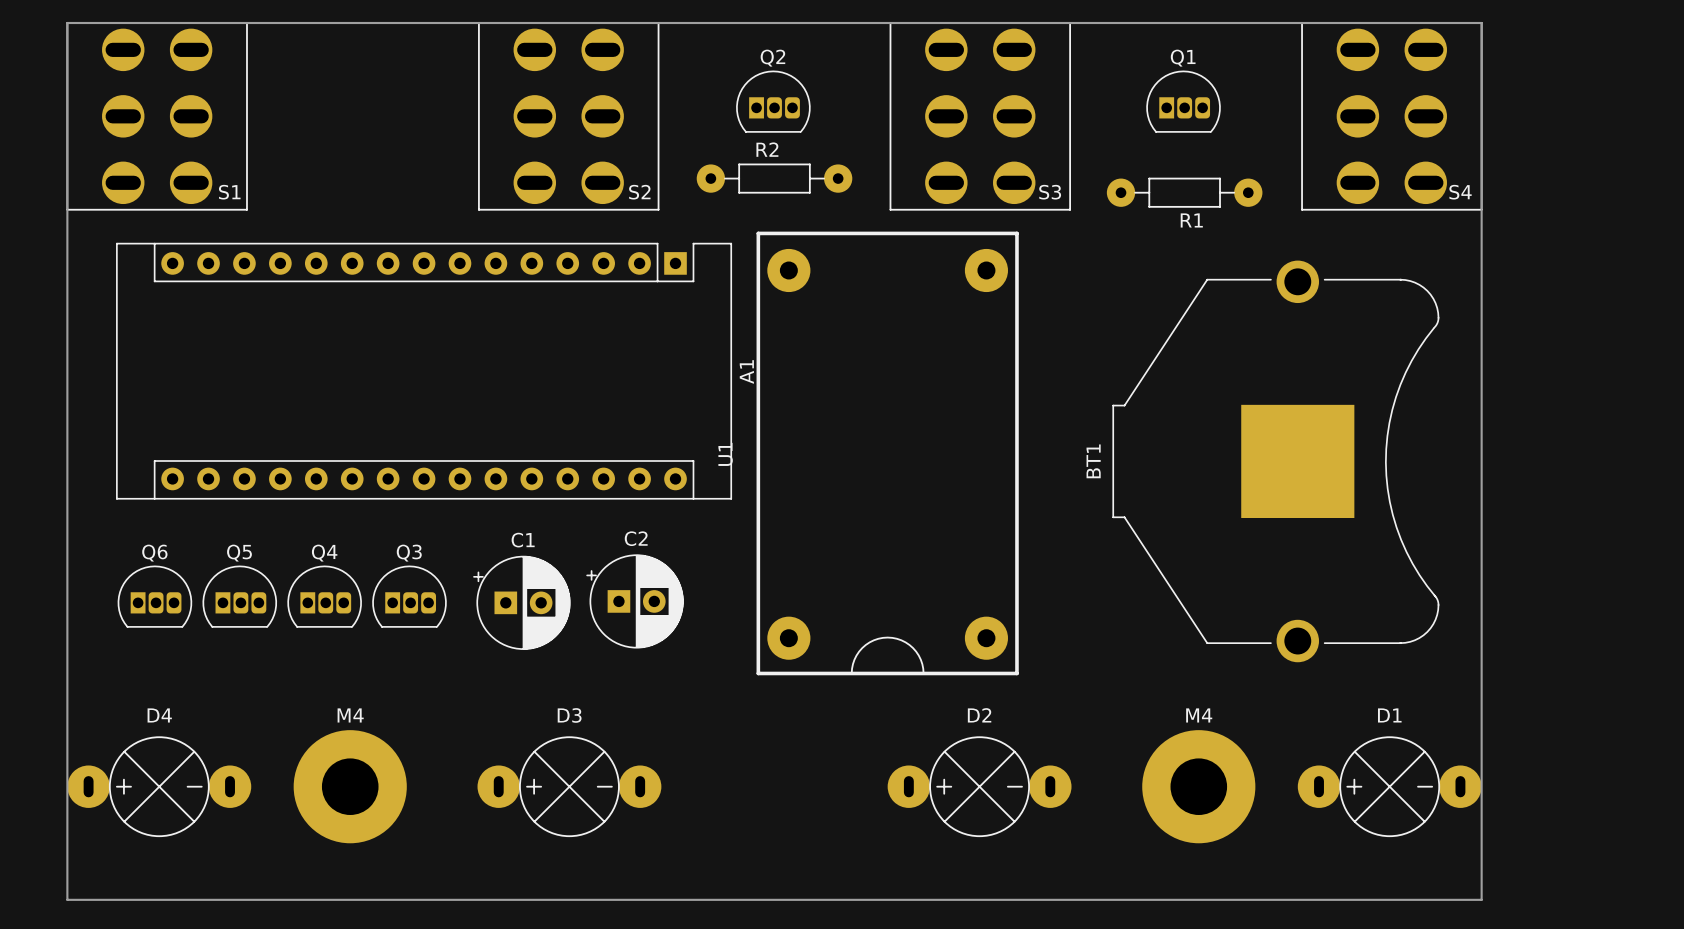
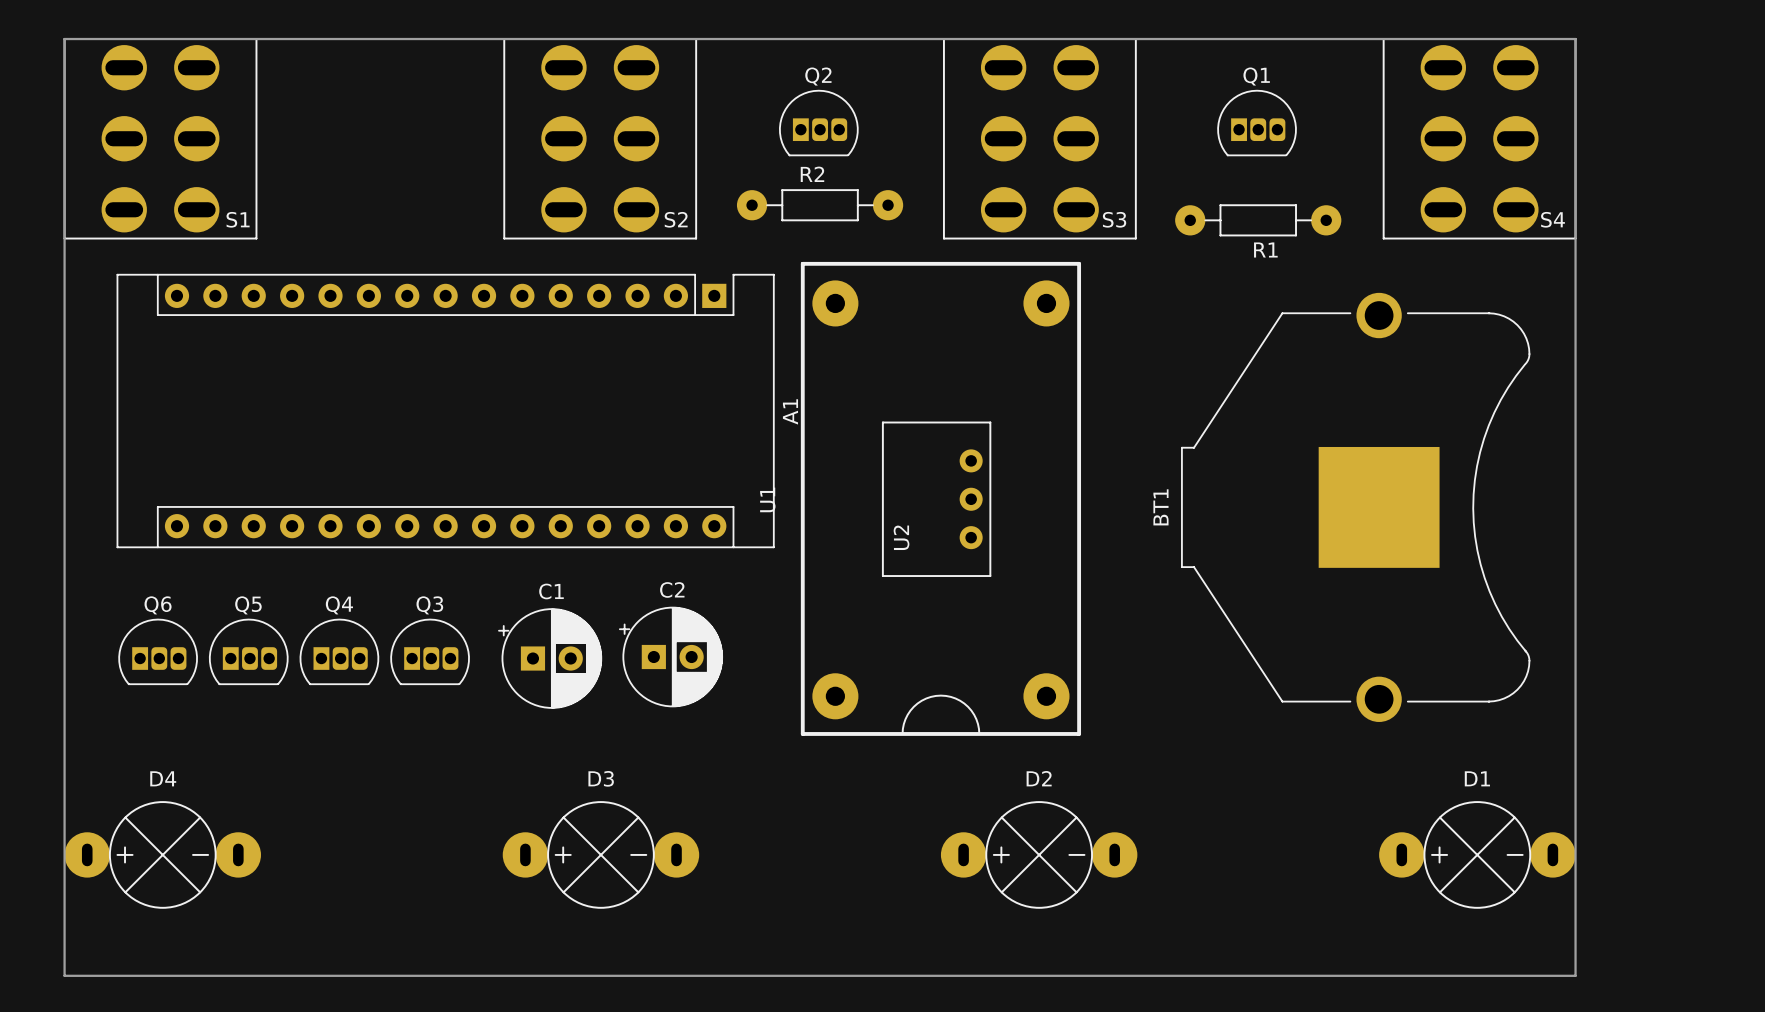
U2: none -> (936, 499)
M4: (350, 786) -> none
M4: (1198, 786) -> none

